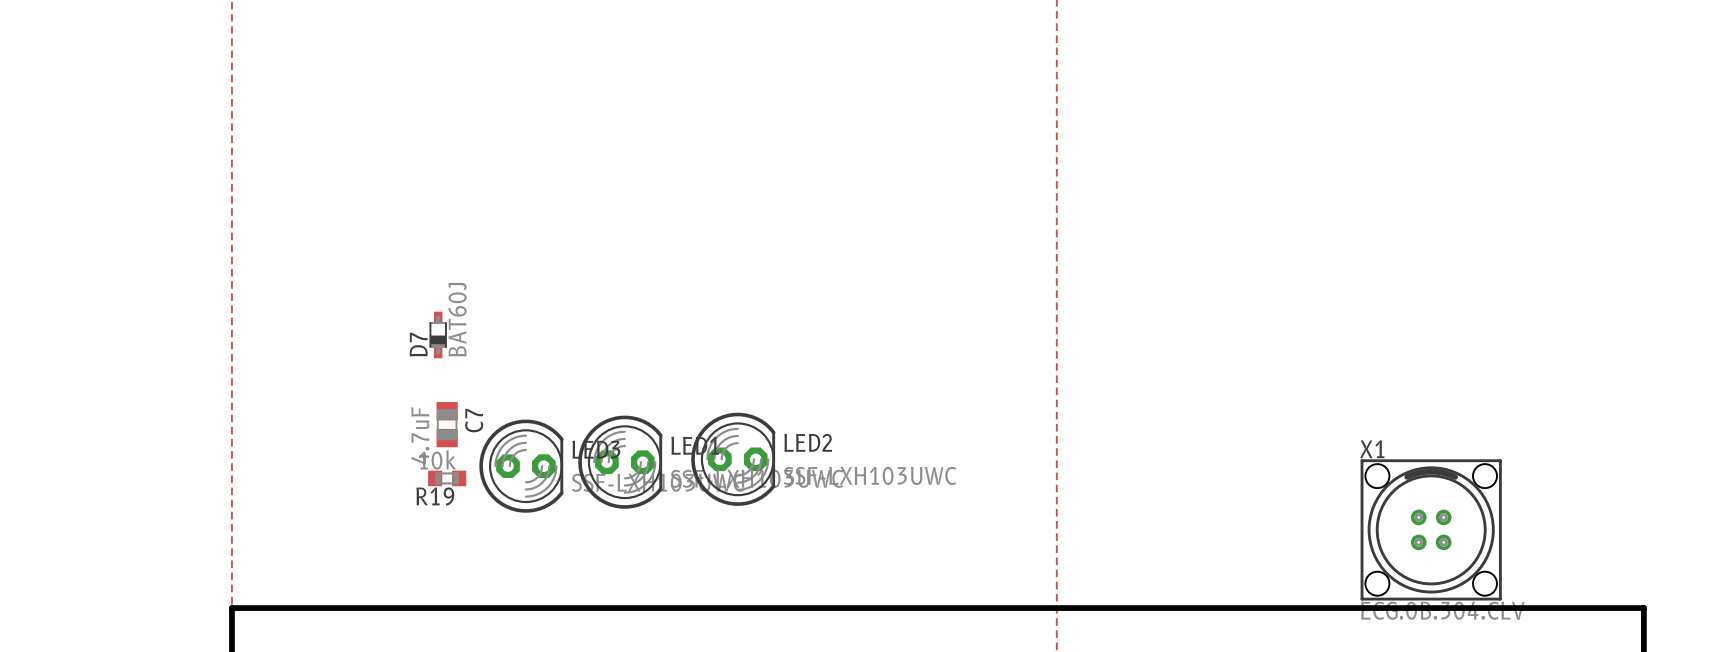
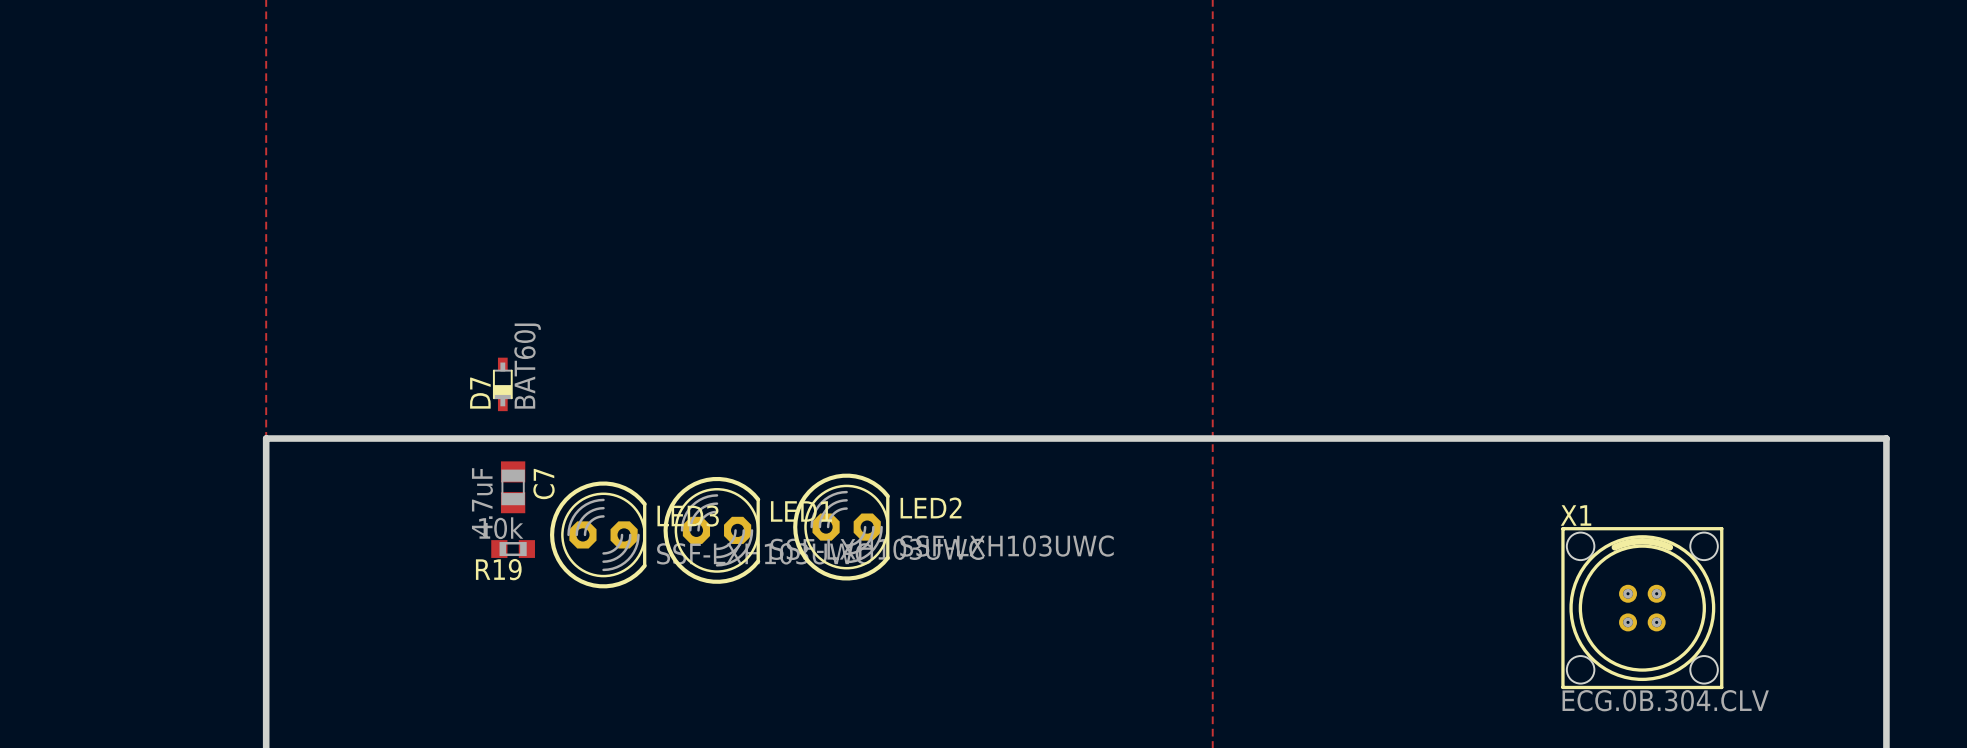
board edge: (231, 608) (1643, 608) -> (266, 697) (266, 438) (1886, 438) (1886, 697)

